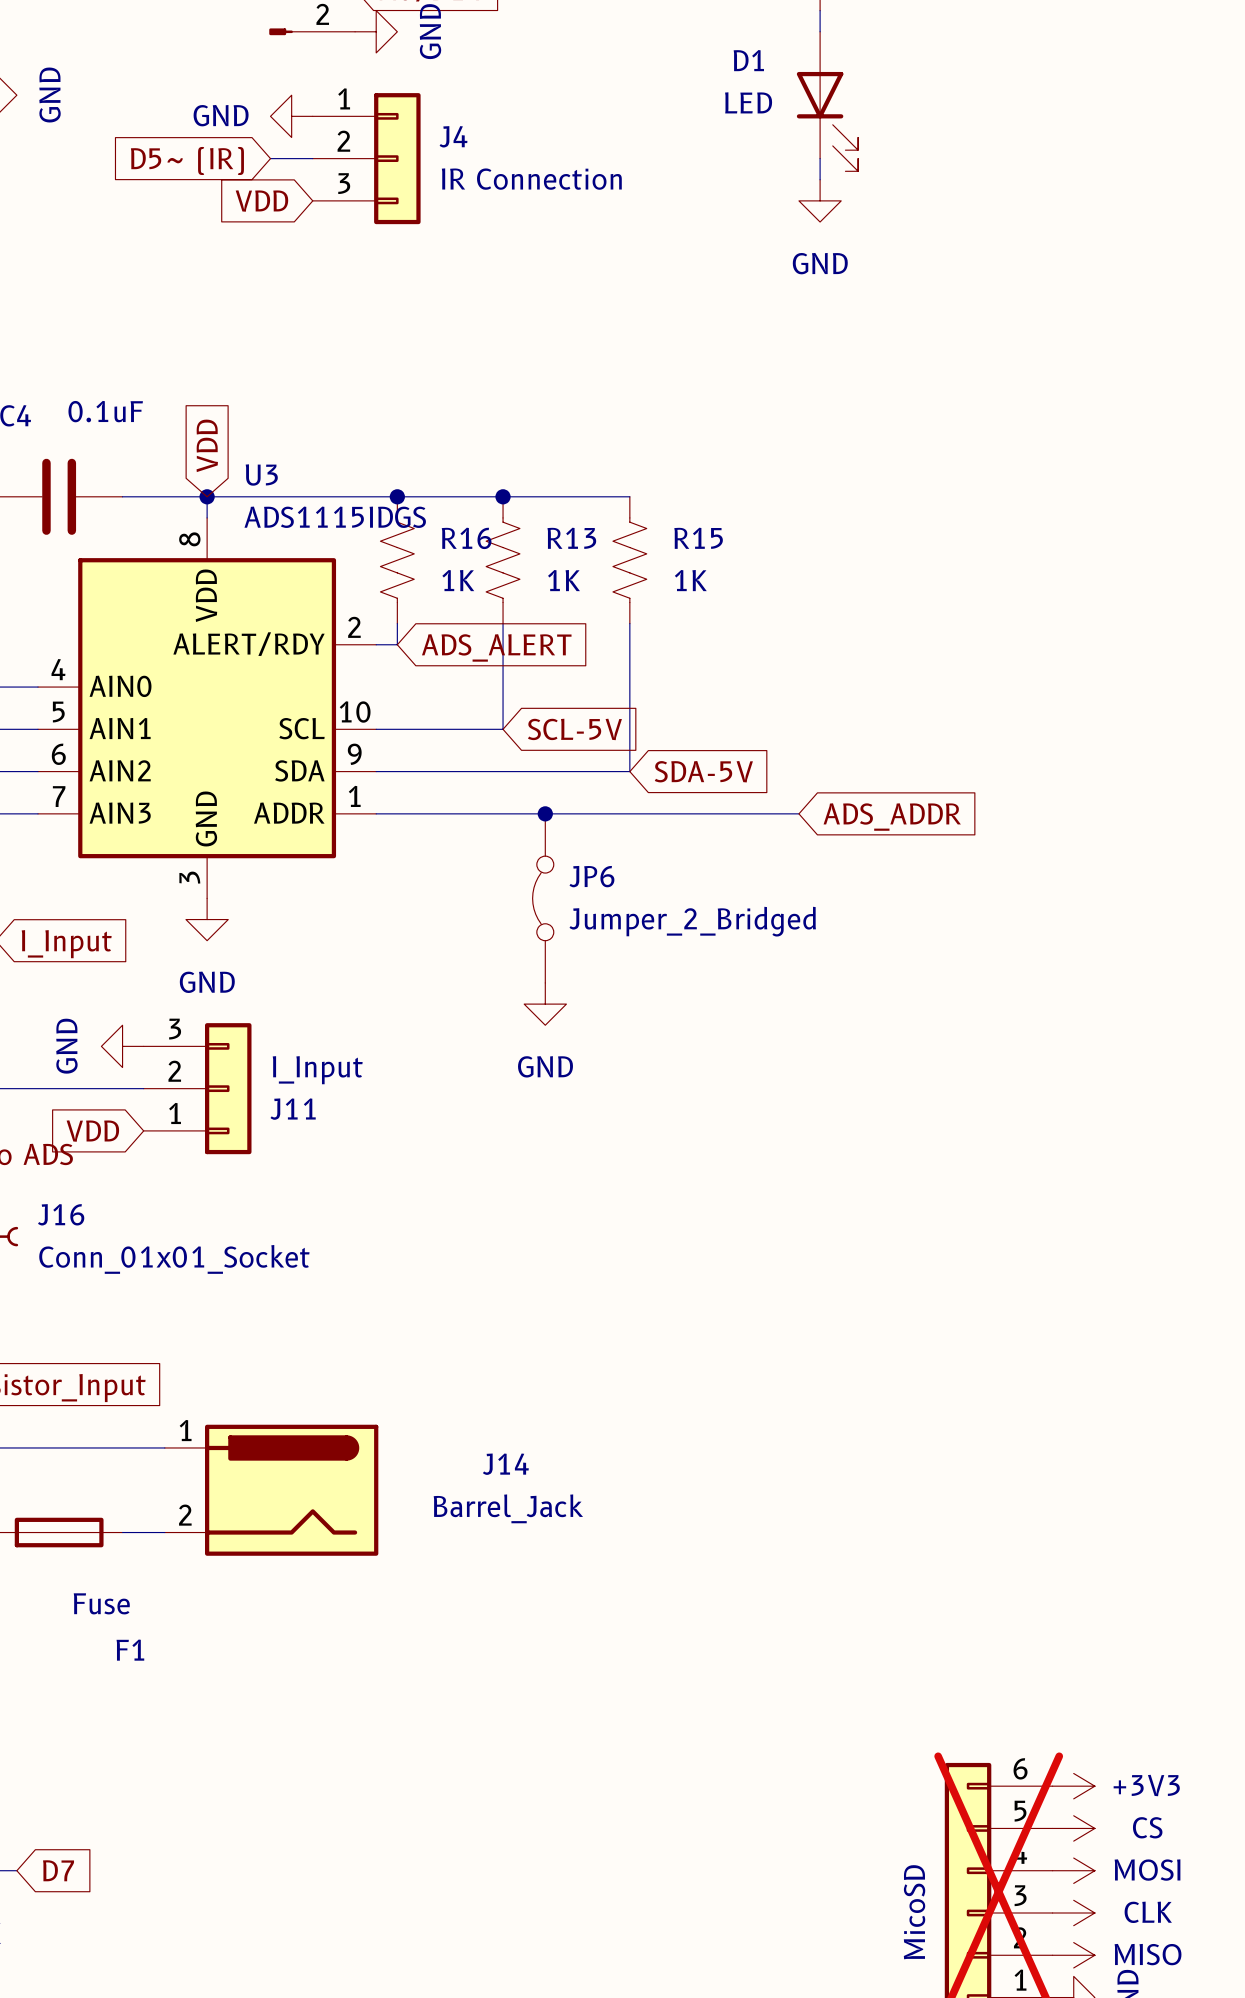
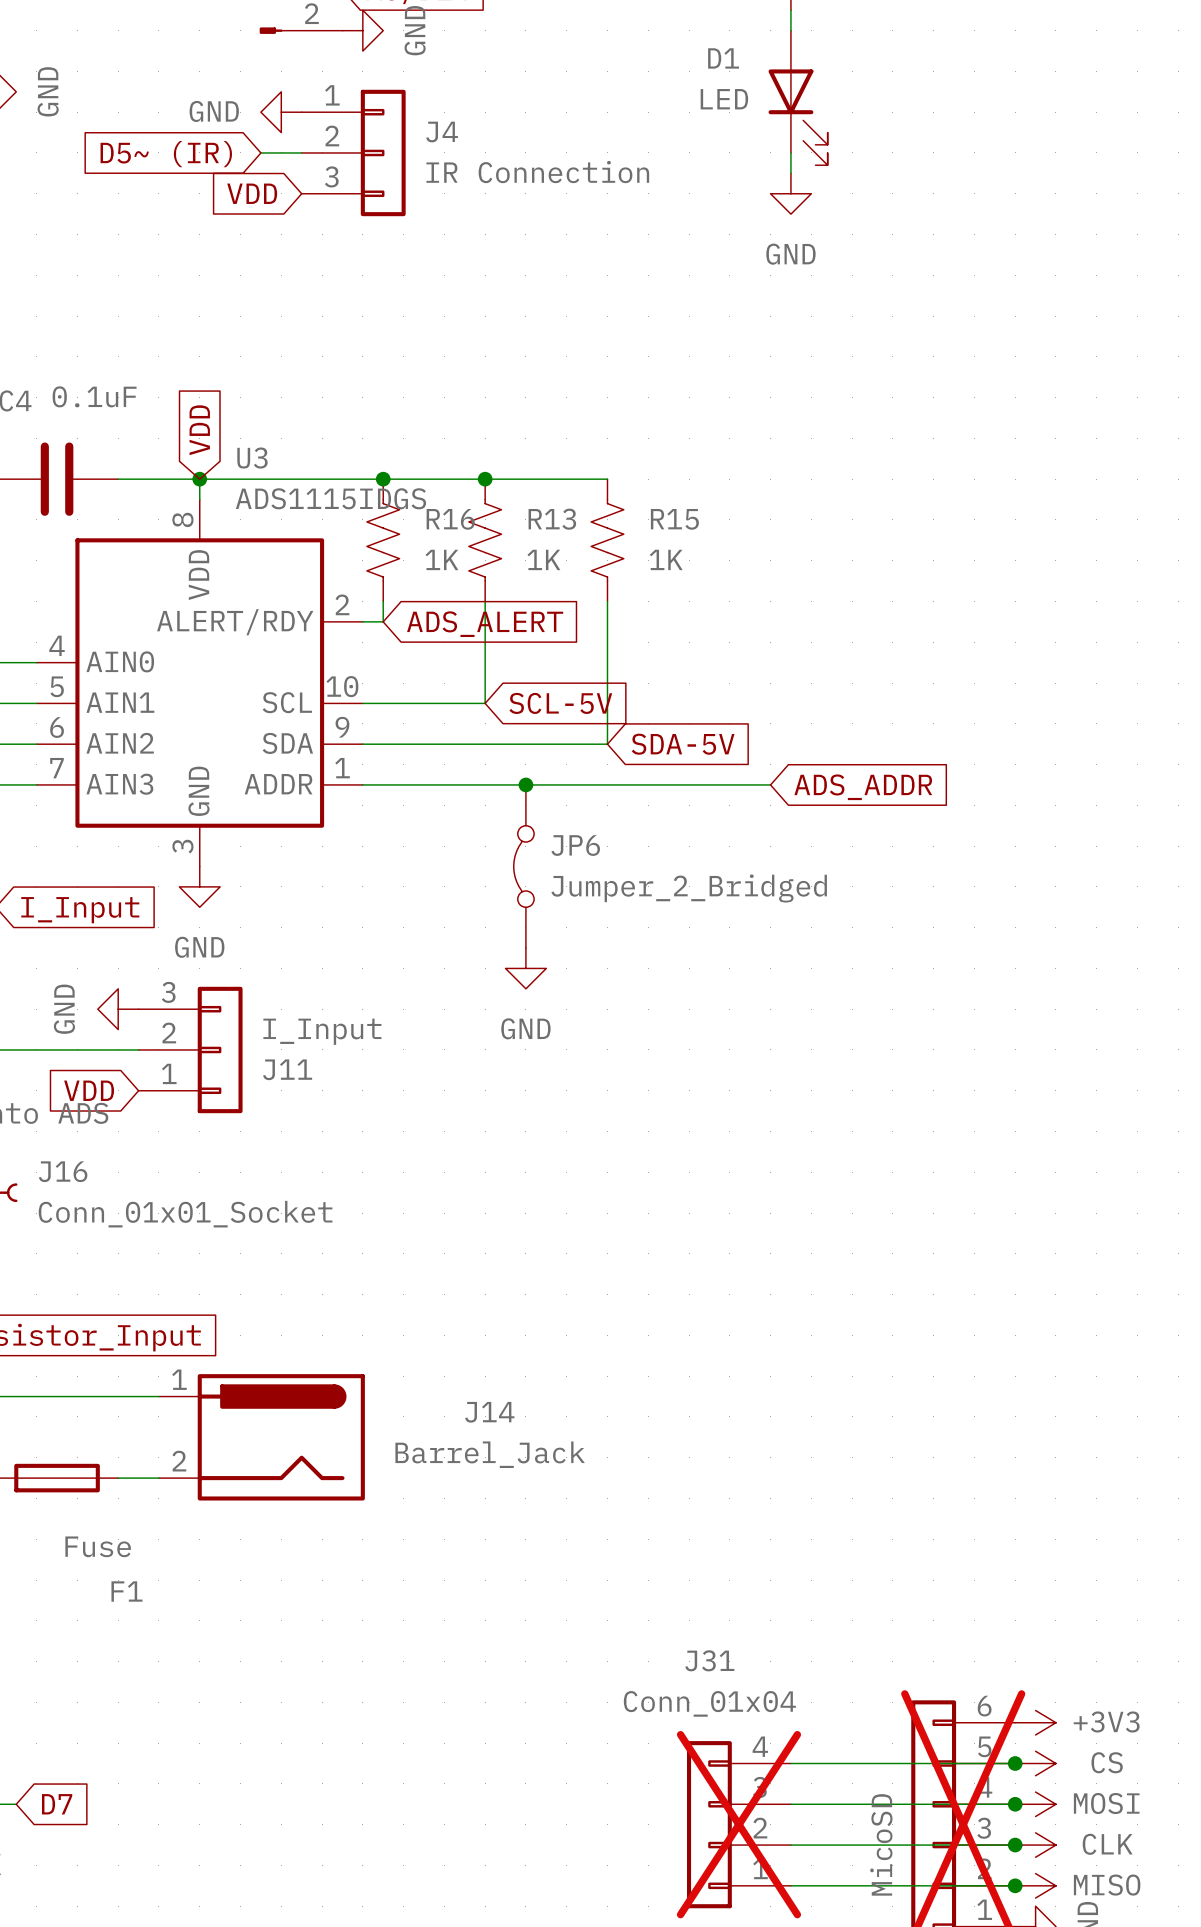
wire: none -> (790, 1763) (1015, 1763)
junction: none -> (1015, 1763)
wire: none -> (790, 1804) (1015, 1804)
junction: none -> (1015, 1804)
J31: none -> Conn_01x04 (738, 1824)
wire: none -> (790, 1845) (1015, 1845)
junction: none -> (1015, 1845)
wire: none -> (790, 1885) (1015, 1885)
junction: none -> (1015, 1885)

